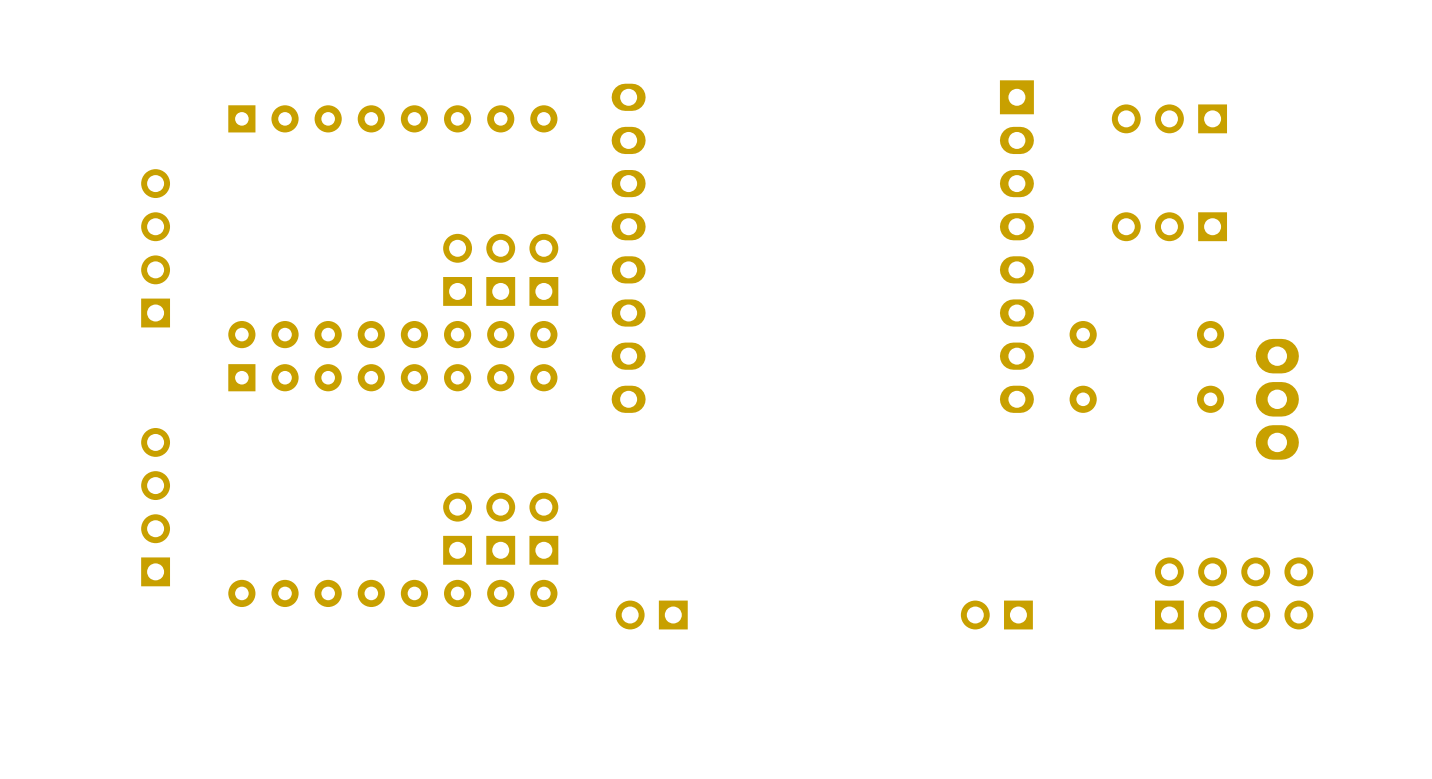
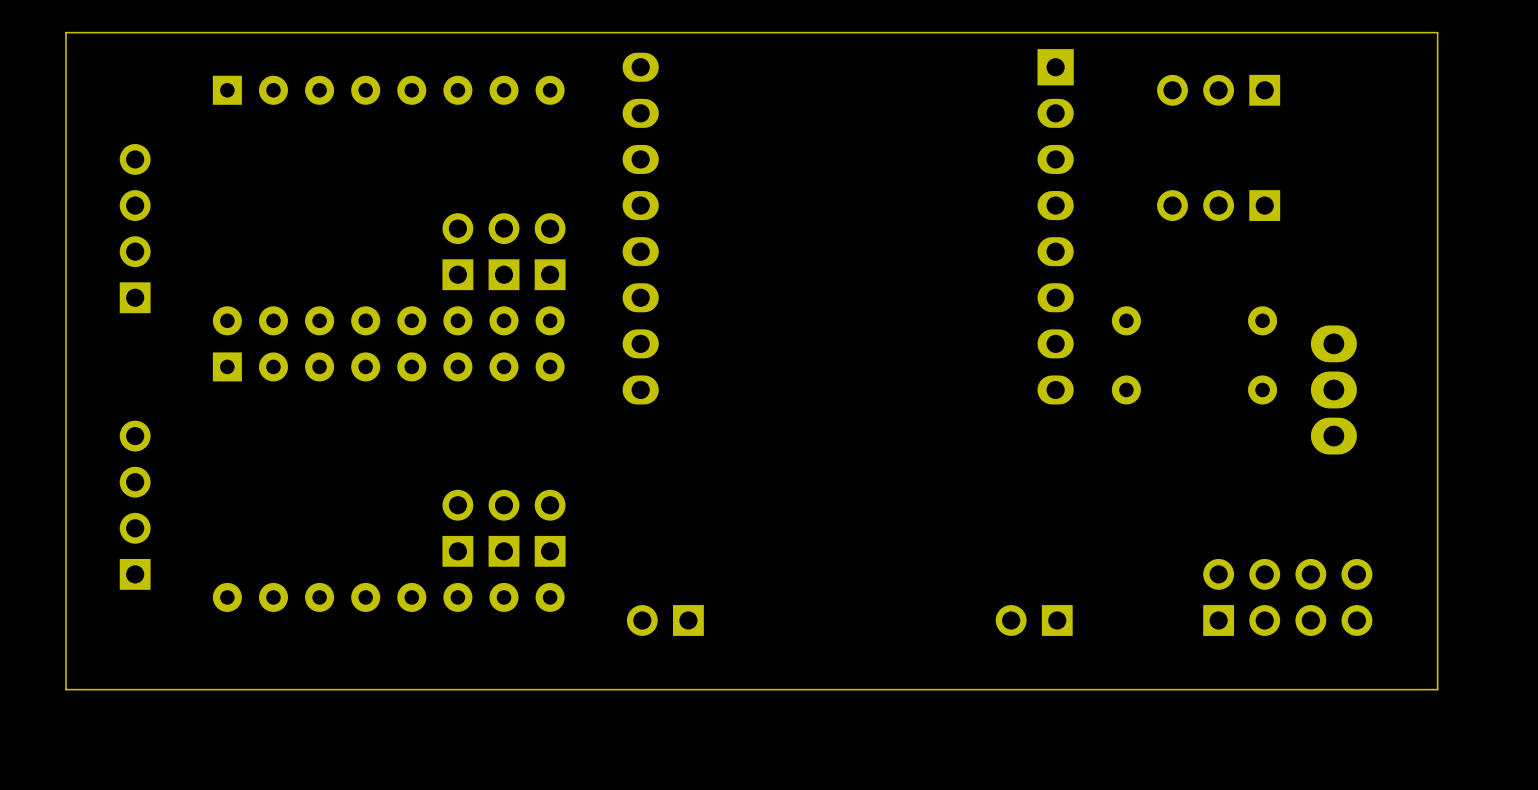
board edge: none -> (1437, 32) (1437, 689) (66, 689) (66, 32) (1437, 32)

